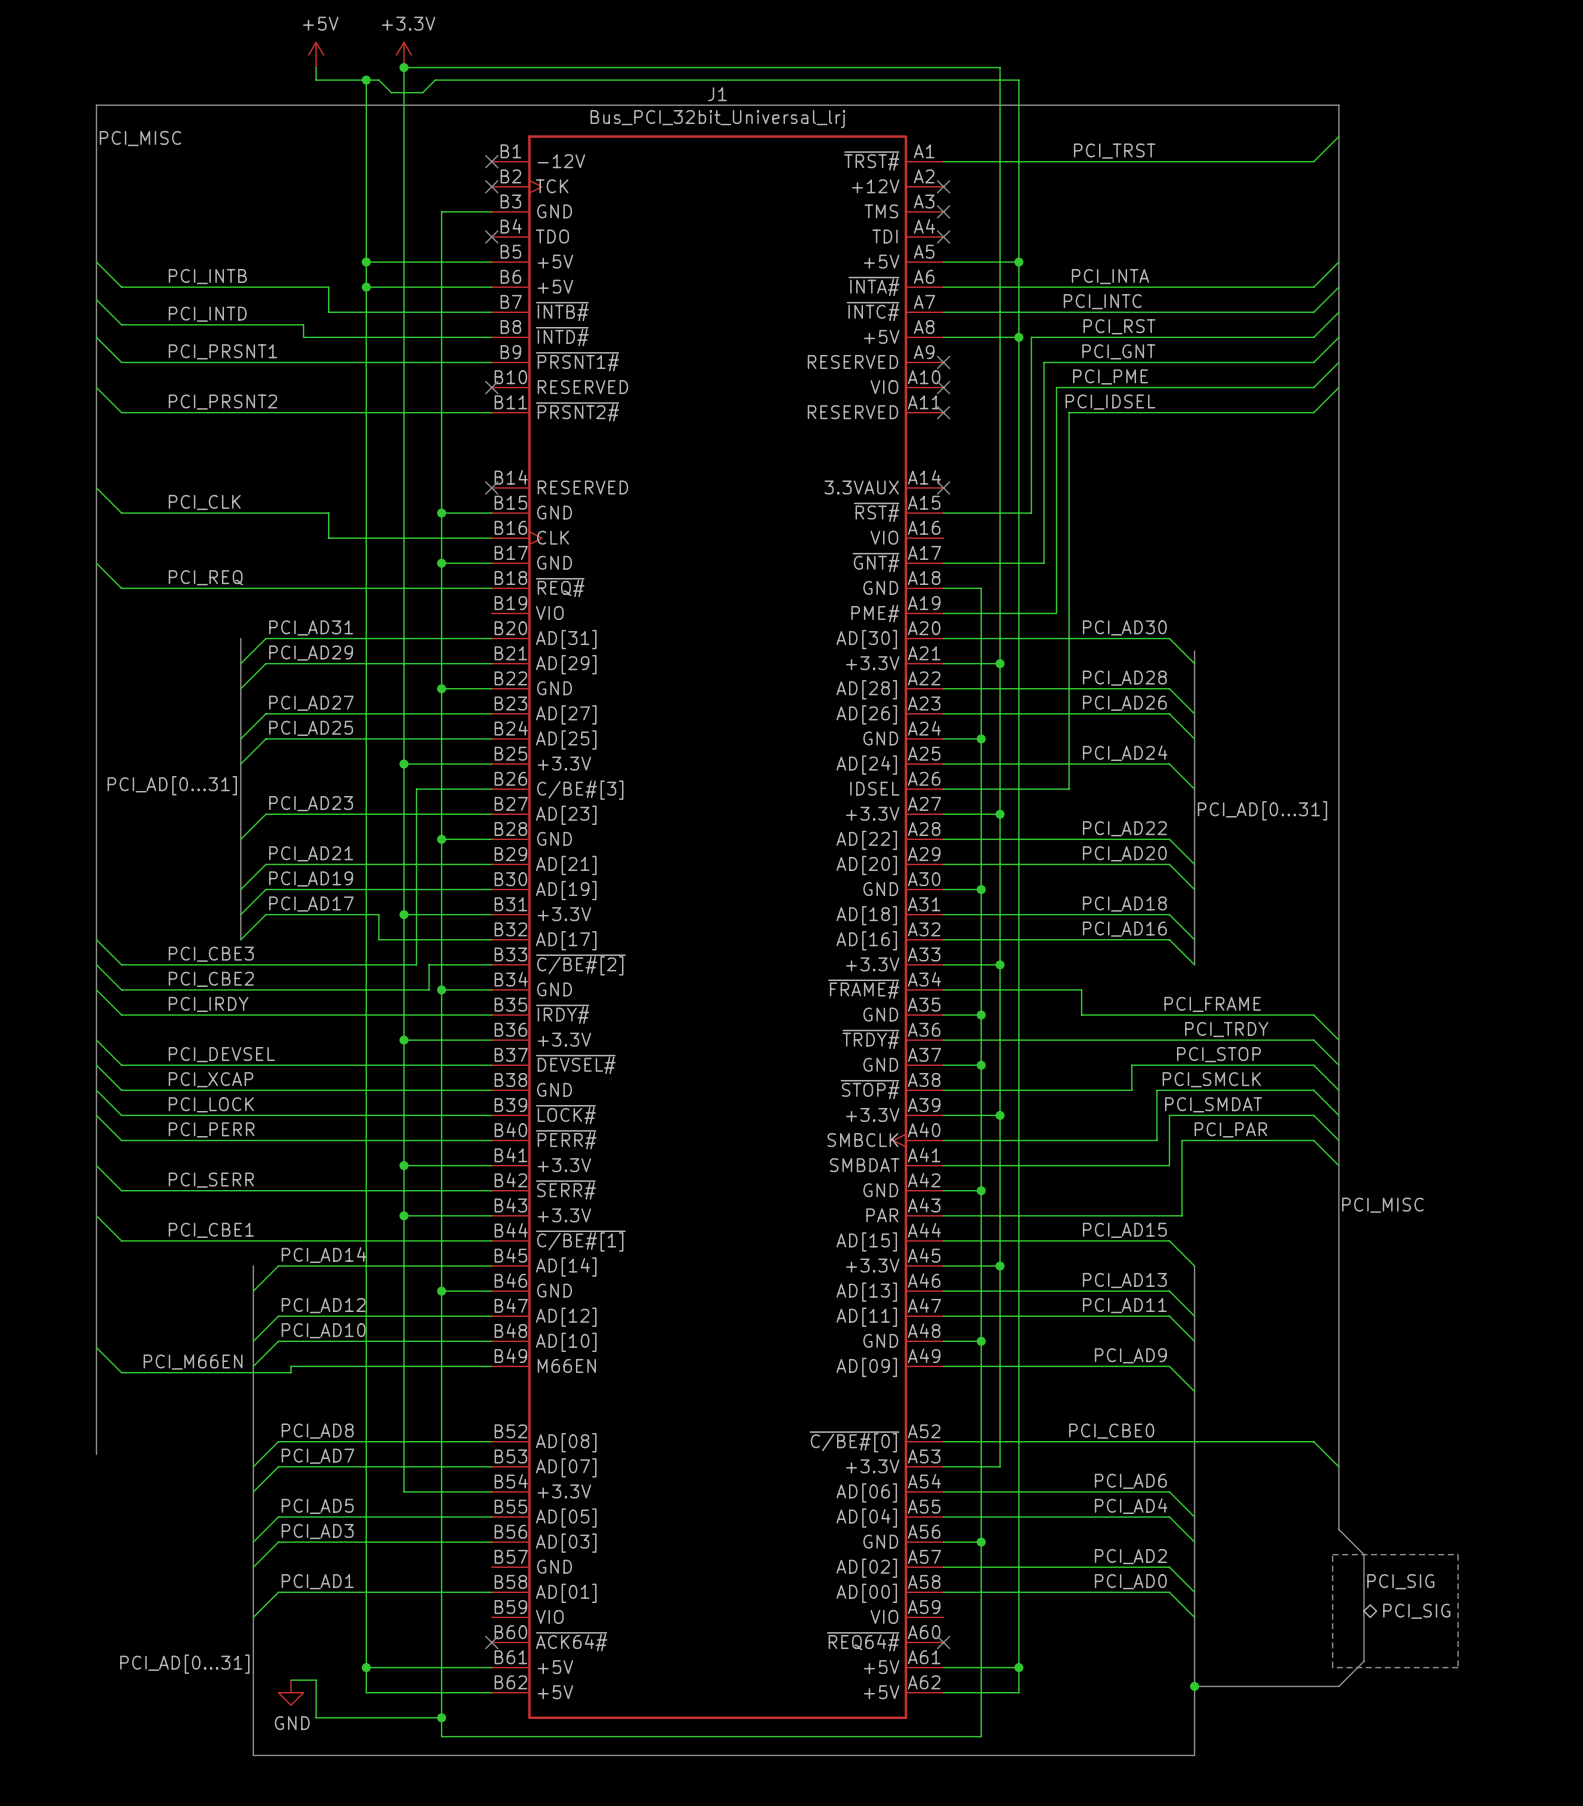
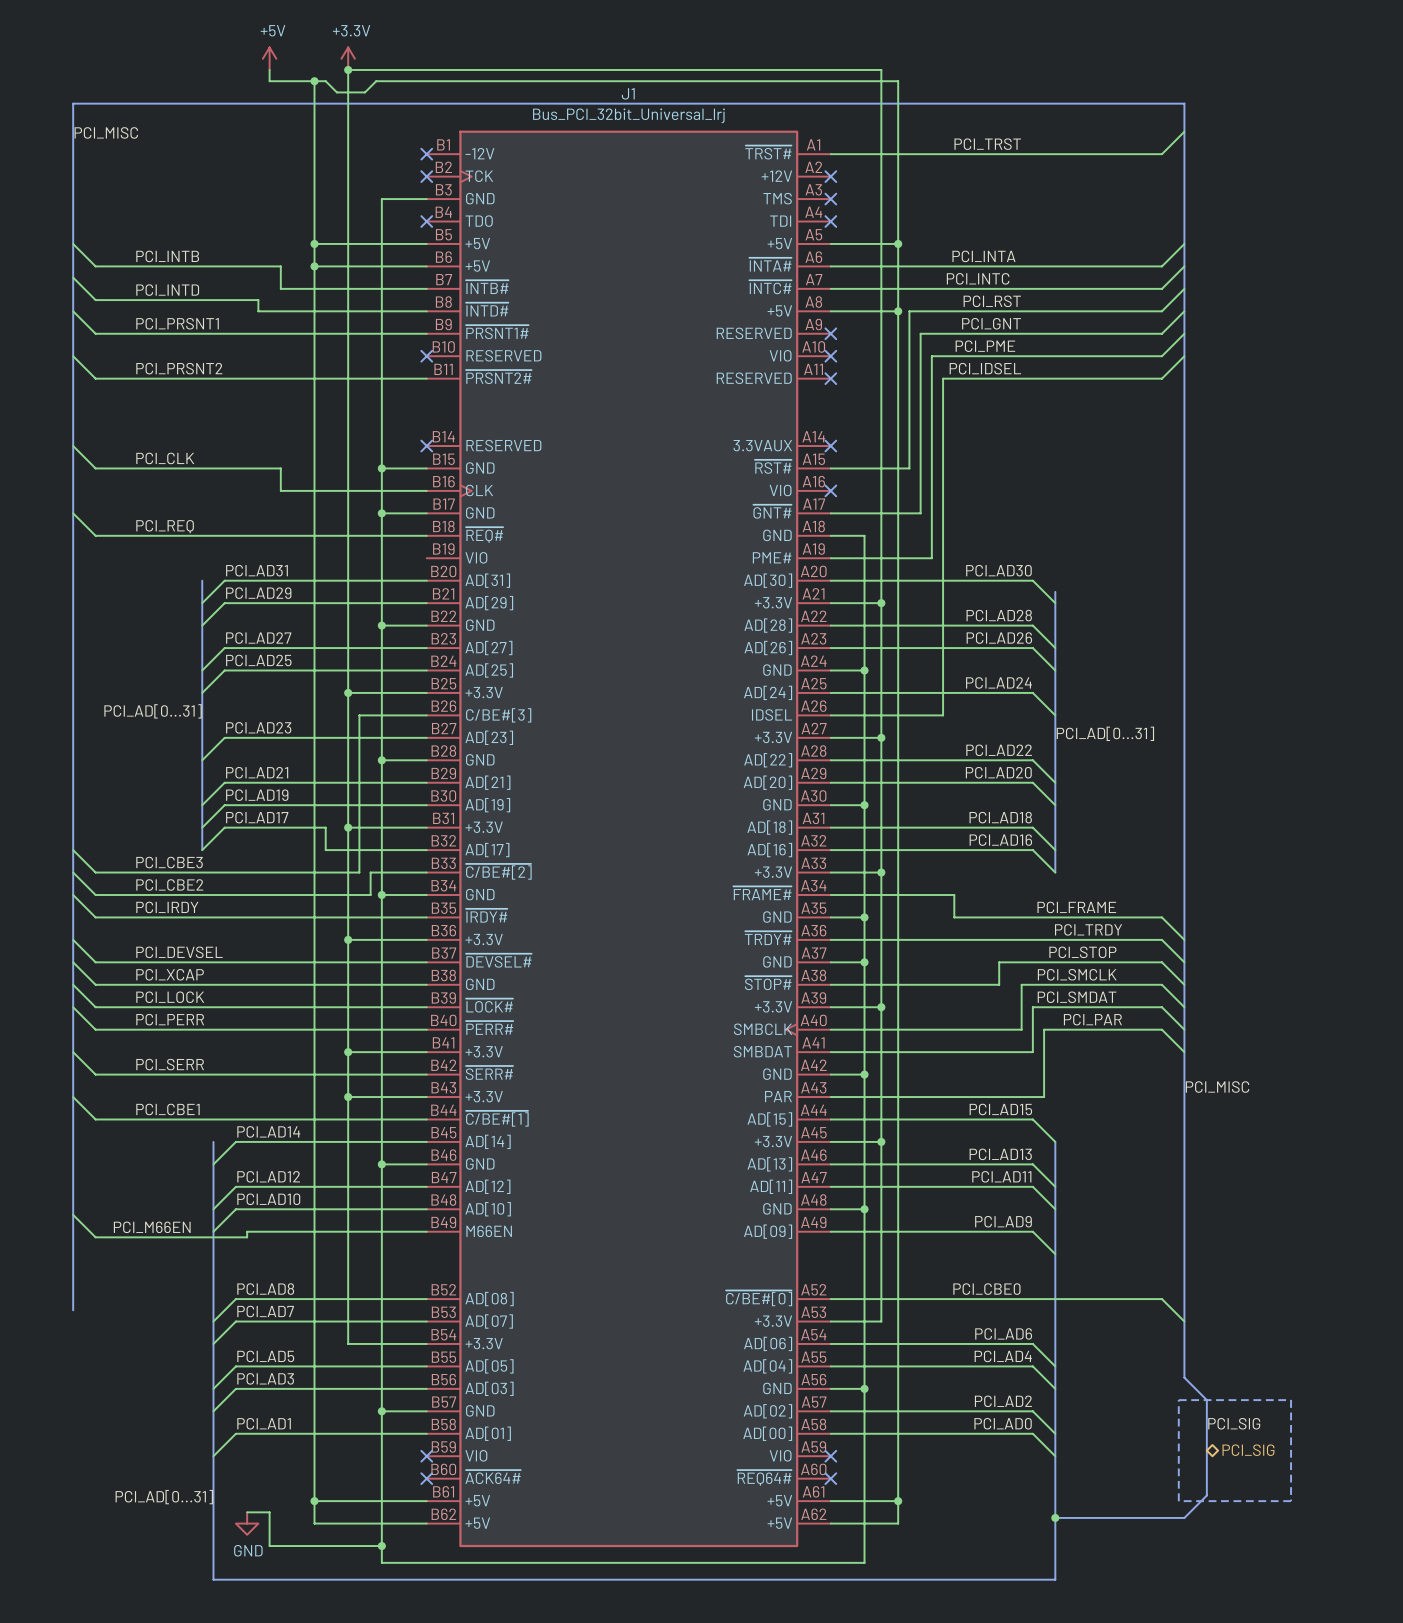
no-connect mark: none -> (830, 490)
wire: none -> (381, 1411) (426, 1411)
junction: none -> (381, 1411)
no-connect mark: none -> (426, 1456)
no-connect mark: none -> (830, 1456)

